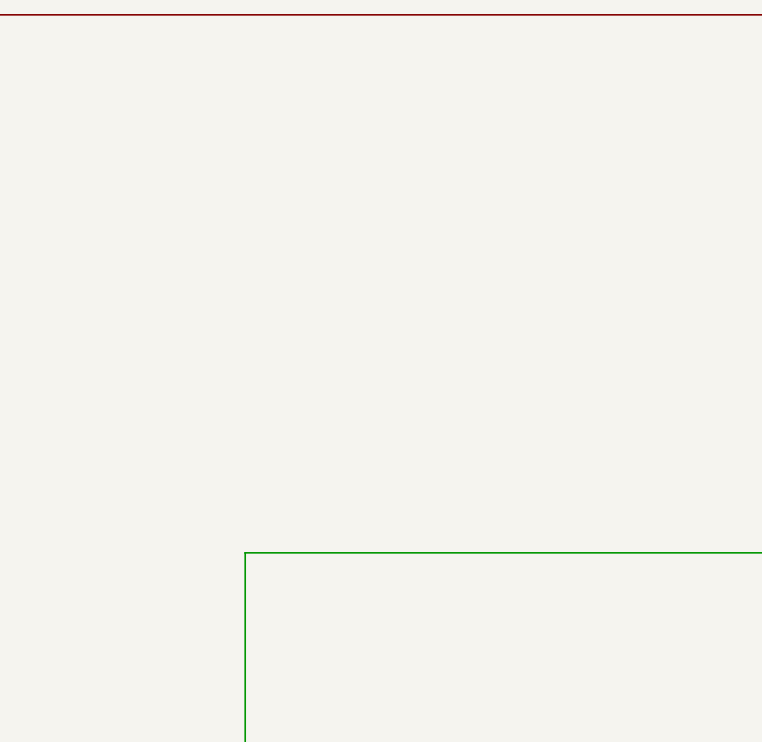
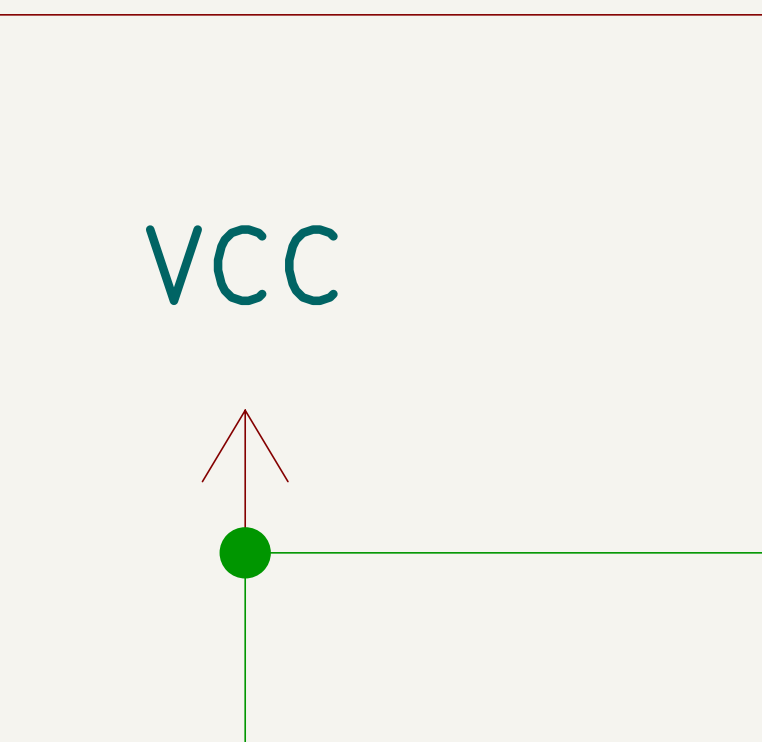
power symbol: none -> VCC (245, 481)
junction: none -> (245, 552)

